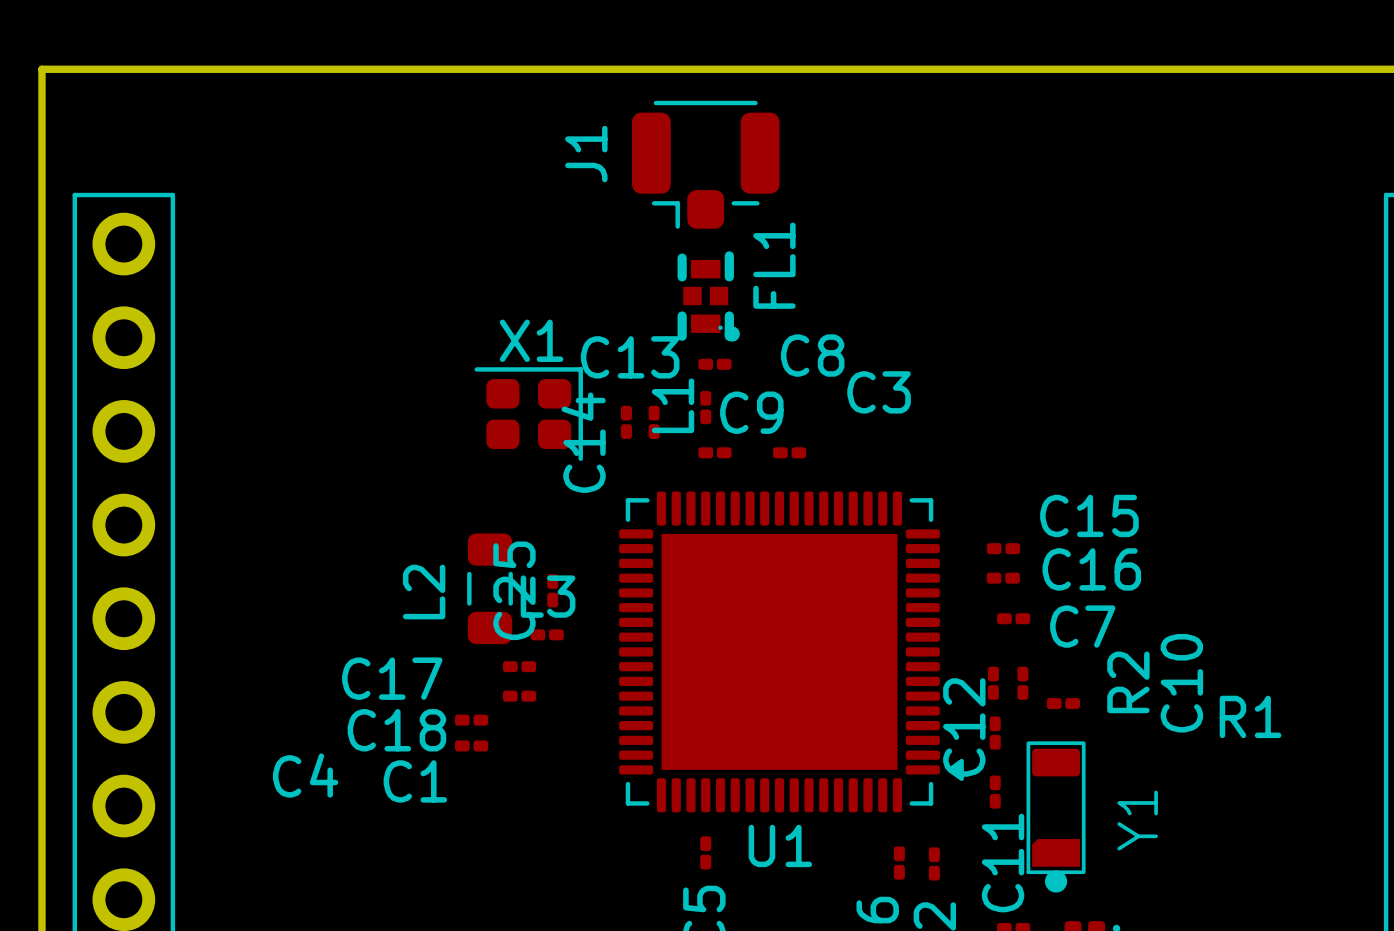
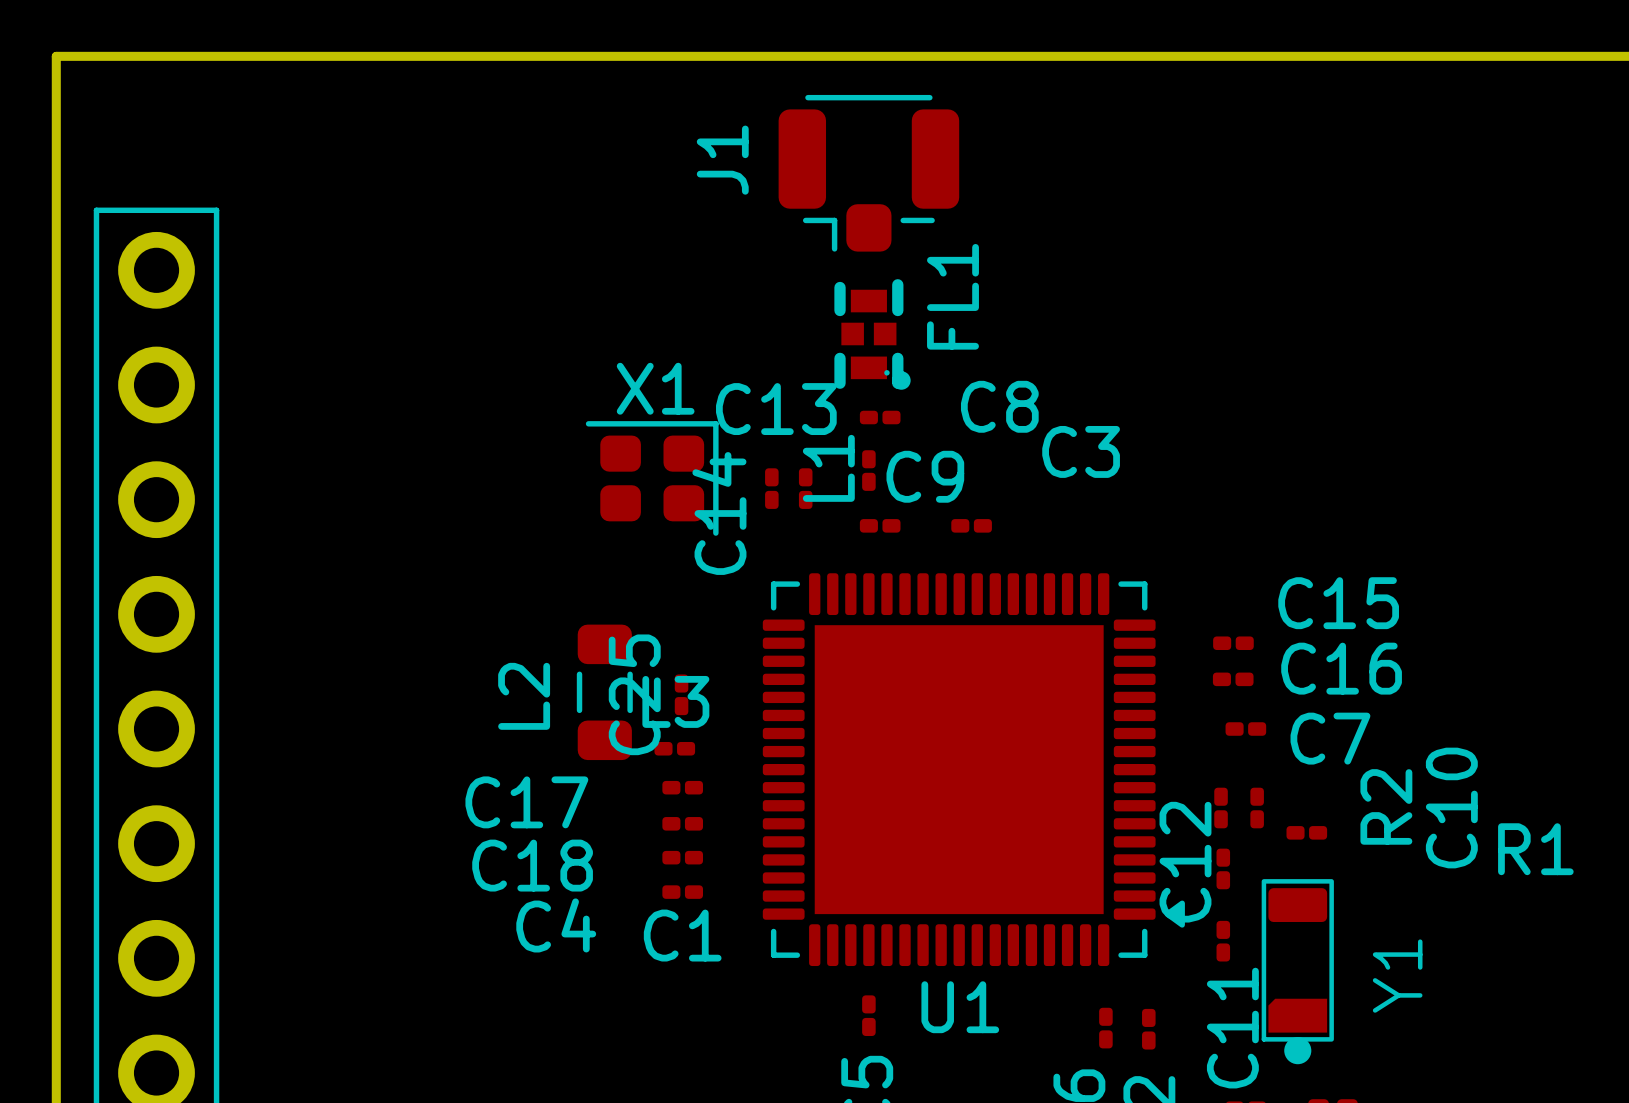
C17 position: (519, 666) -> (682, 787)
C18 position: (519, 696) -> (682, 823)
C4 position: (471, 720) -> (682, 857)
C1 position: (471, 745) -> (682, 892)
C4 name position: C4 (305, 775) -> C4 (556, 925)
C1 name position: C1 (415, 781) -> C1 (682, 935)

